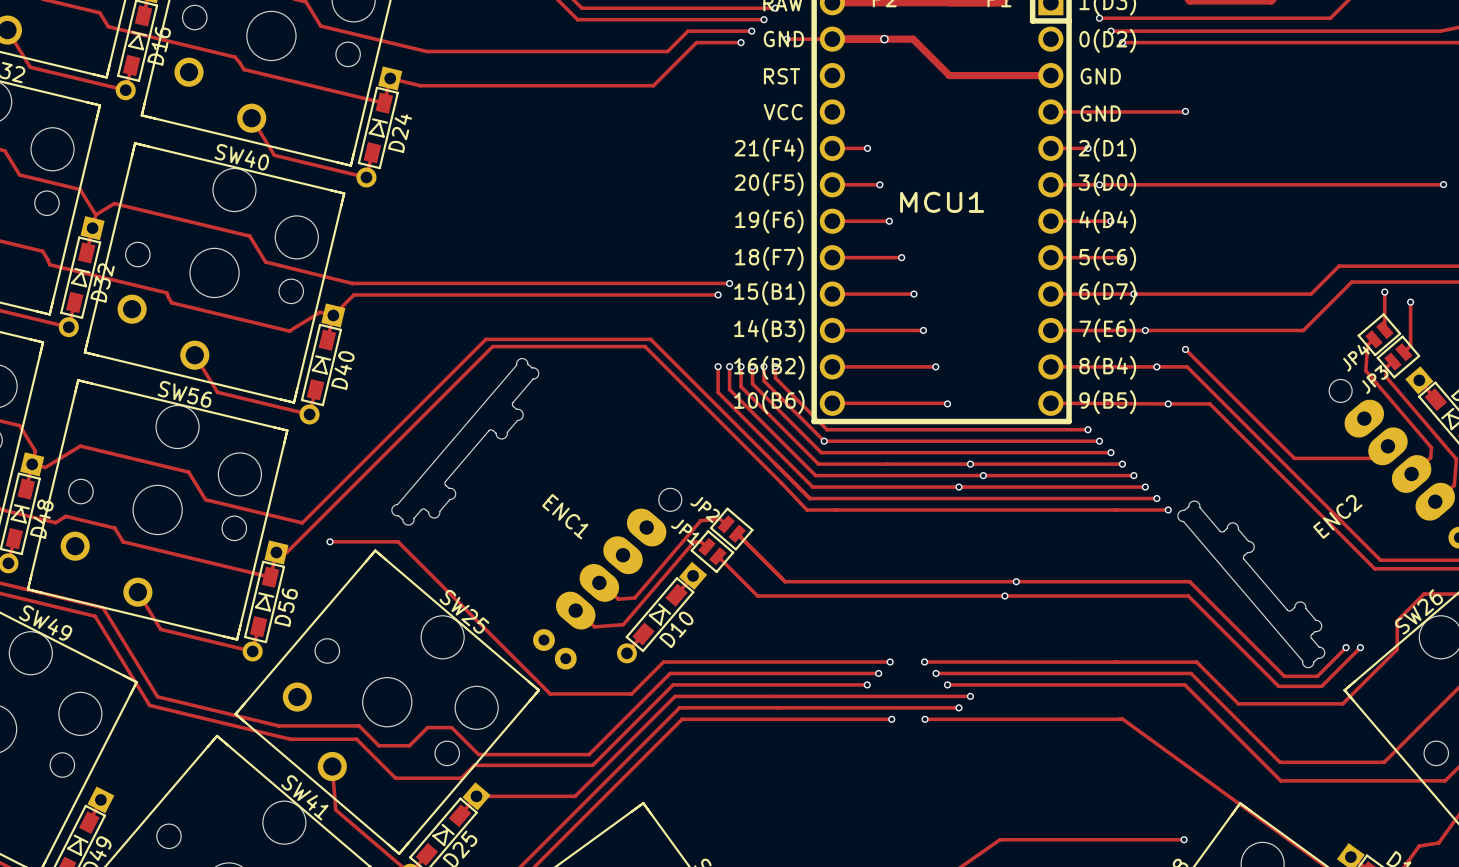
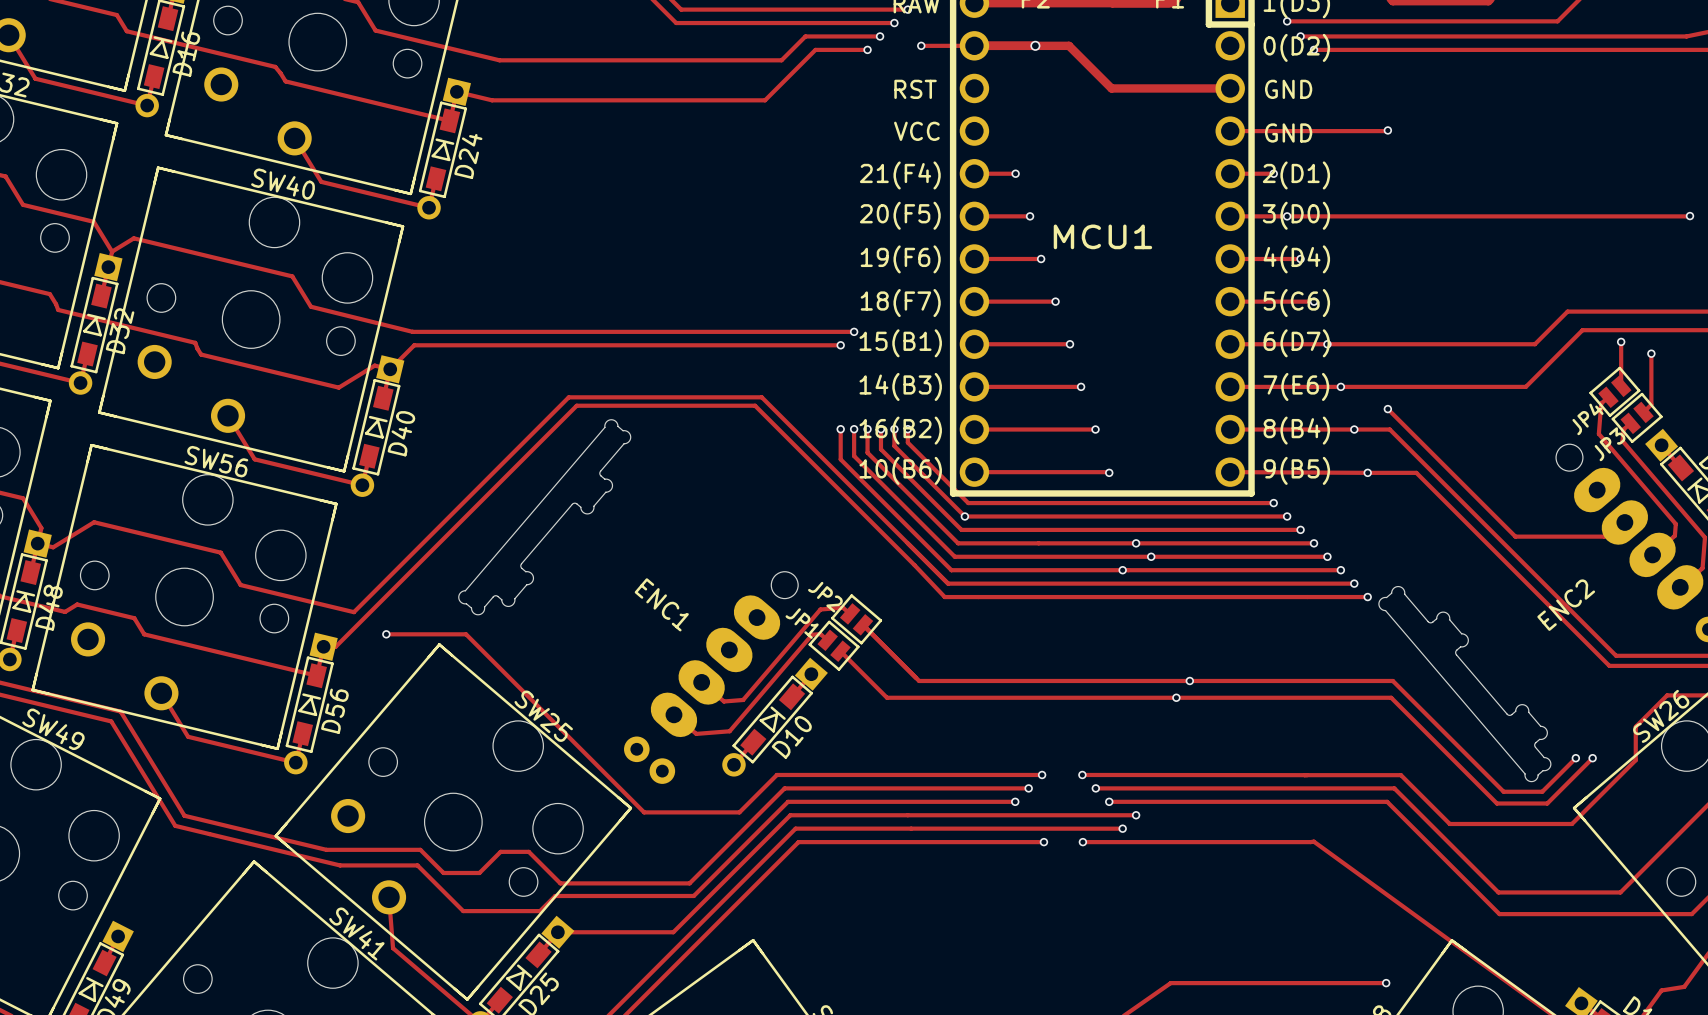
MCU1 text: GND (783, 39) -> none

